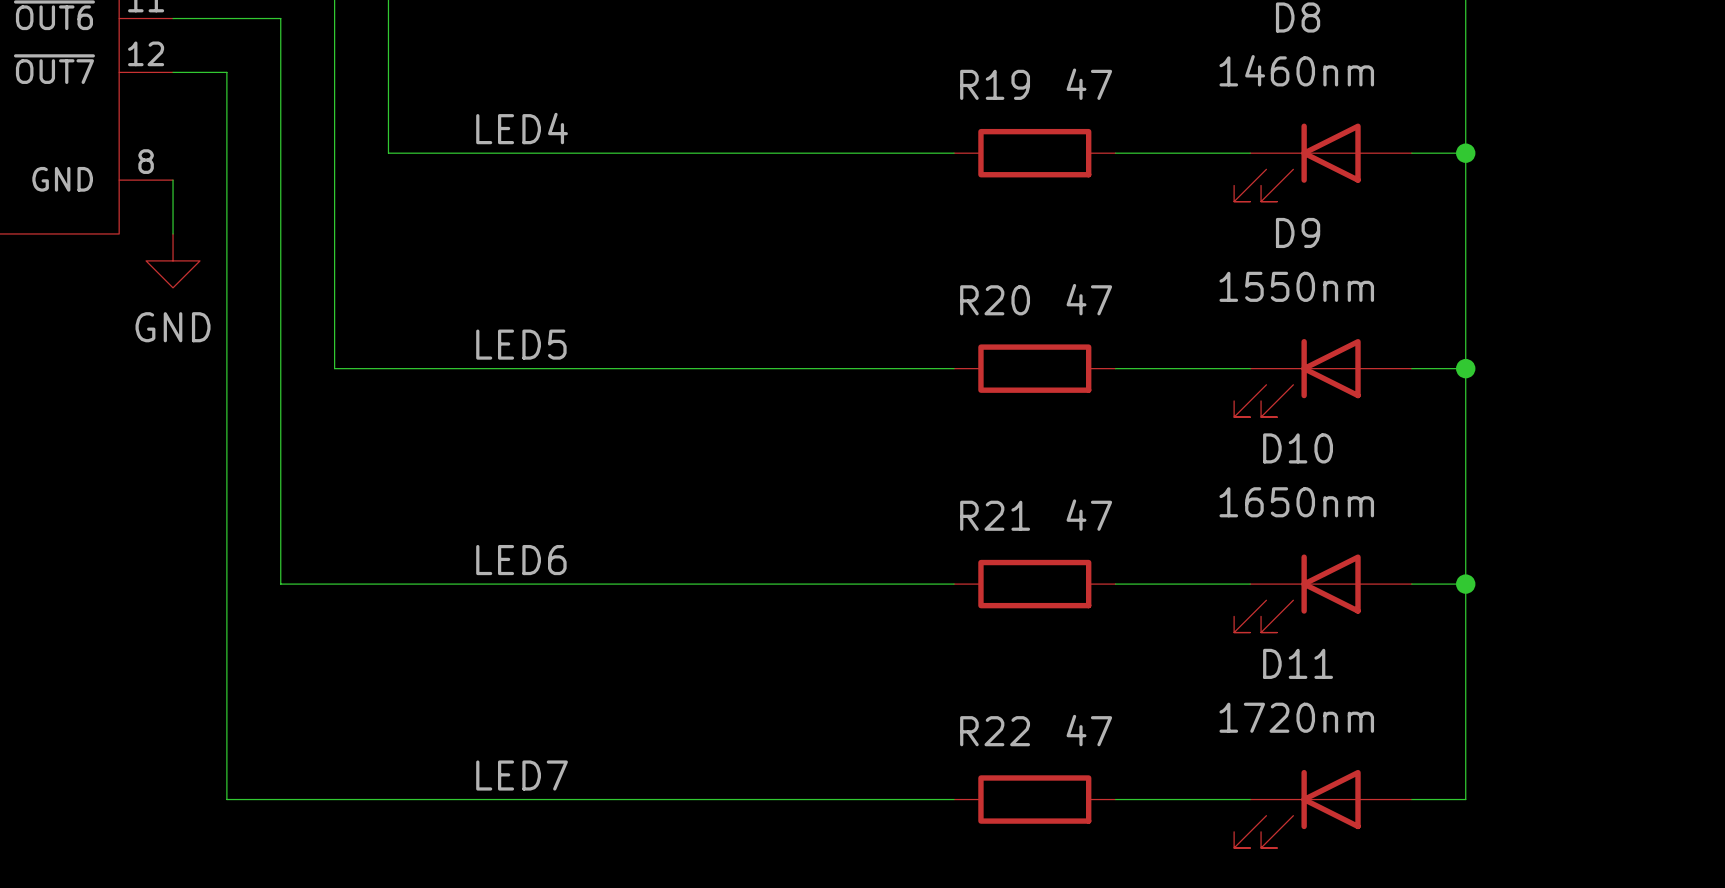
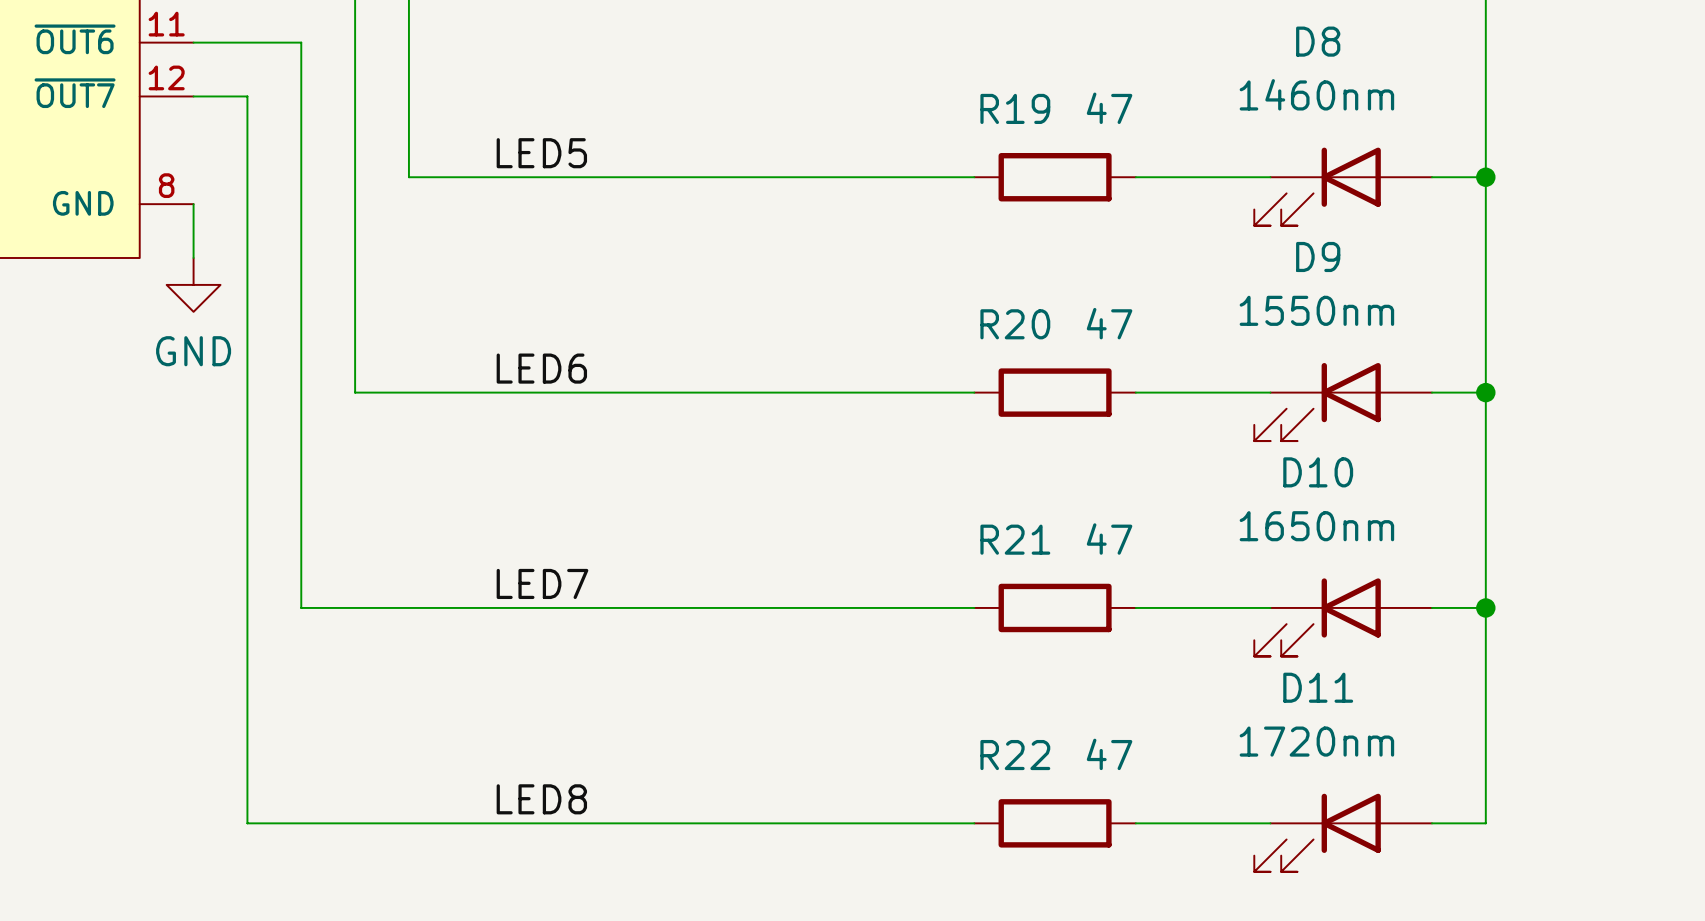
label: LED4 (522, 128) -> LED5 (541, 153)
label: LED5 (521, 344) -> LED6 (541, 368)
label: LED6 (521, 560) -> LED7 (542, 583)
label: LED7 (522, 775) -> LED8 (541, 799)

